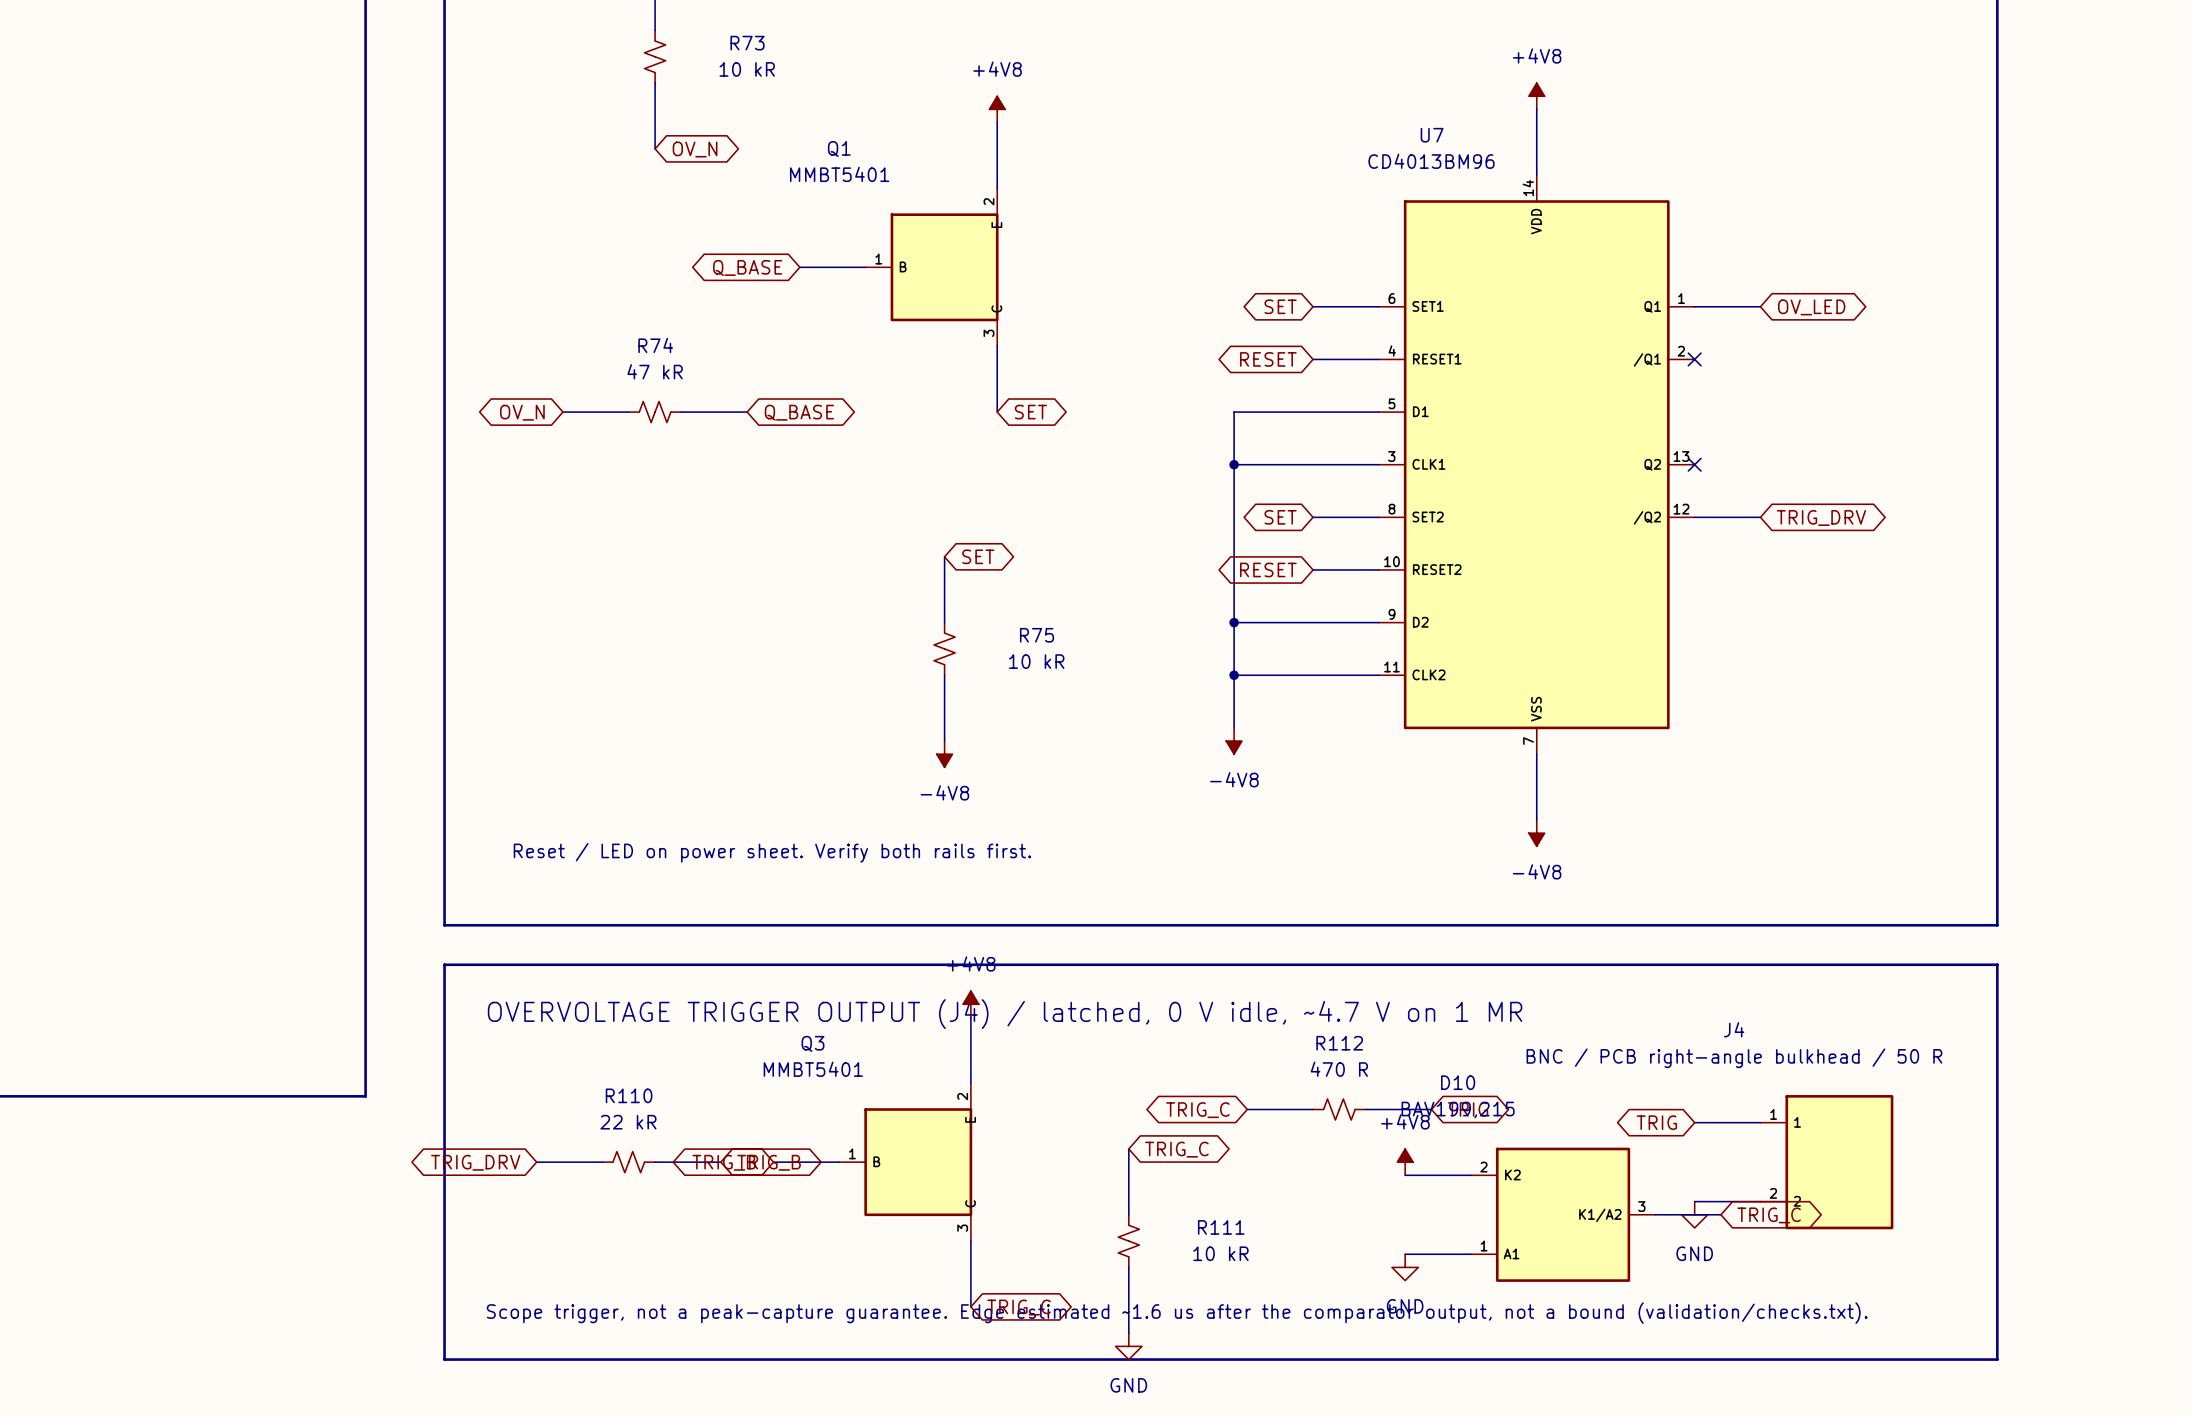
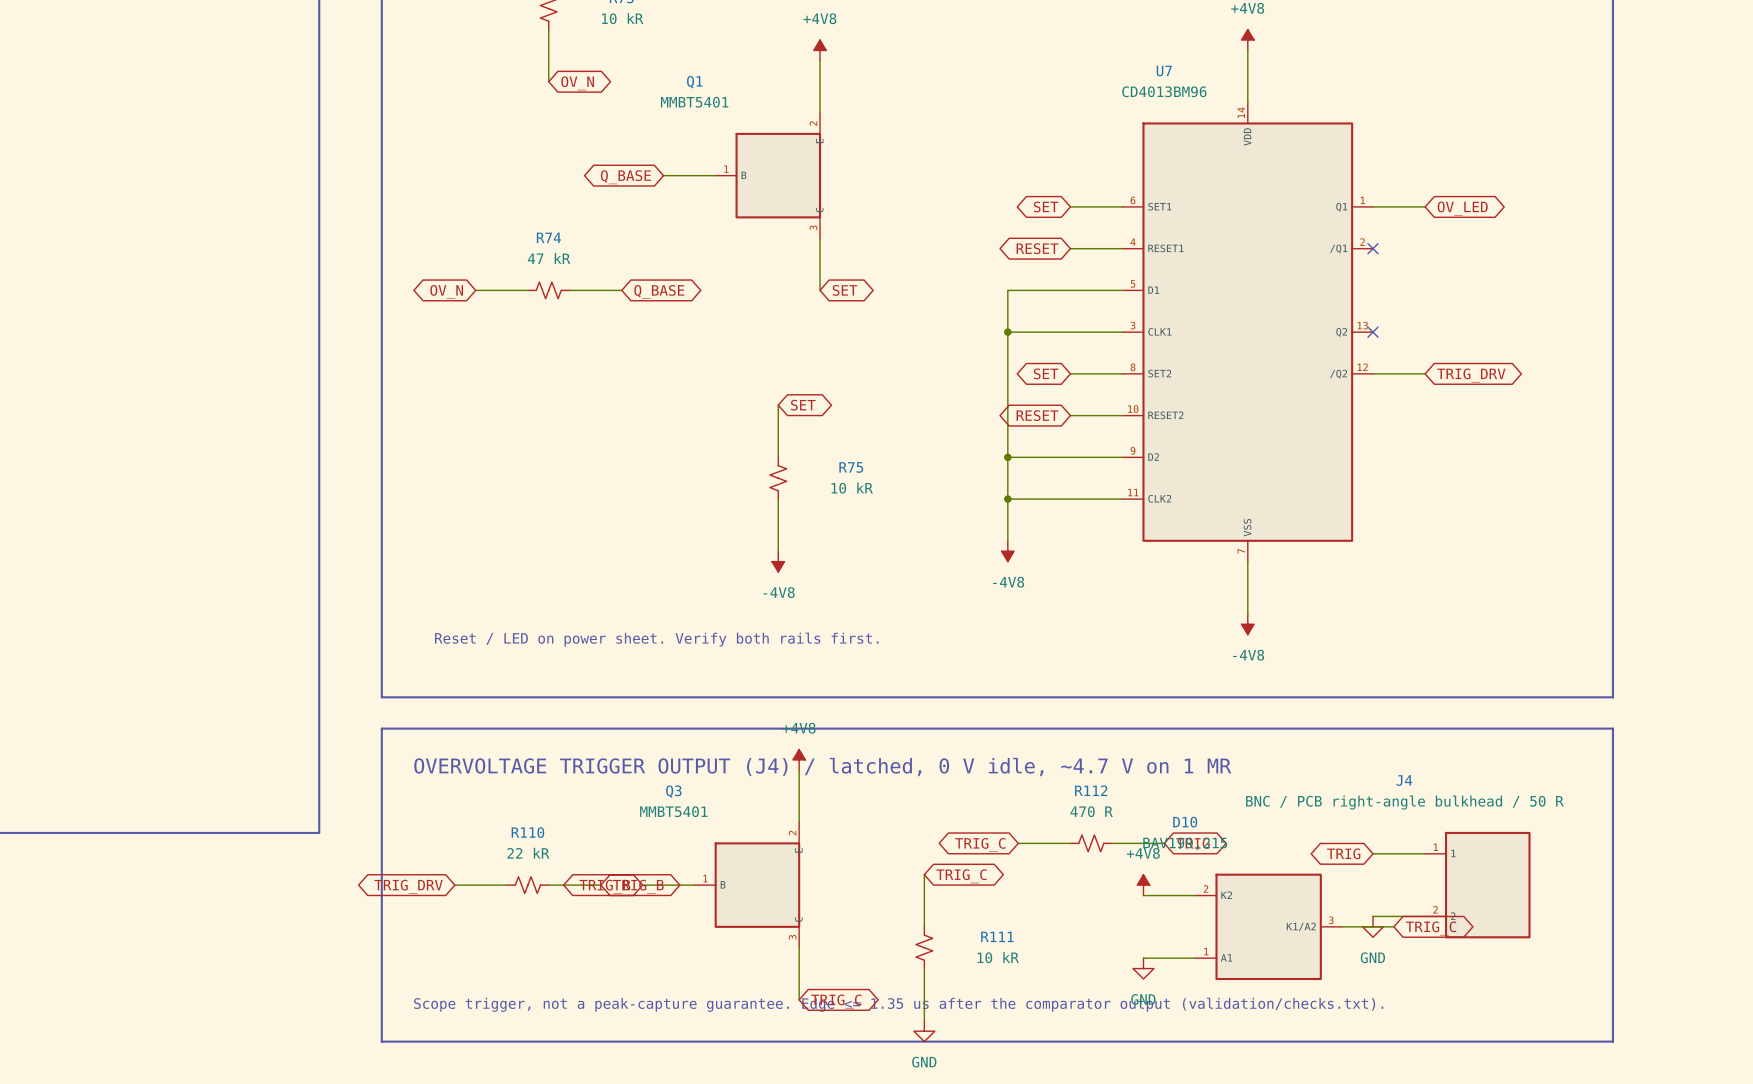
text: Scope trigger, not a peak-capture guarantee. Edge estimated ~1.6 us after the comparator output, not a bound (validation/checks.txt). (1177, 1313) -> Scope trigger, not a peak-capture guarantee. Edge <= 1.35 us after the comparator output (validation/checks.txt). (898, 1004)

